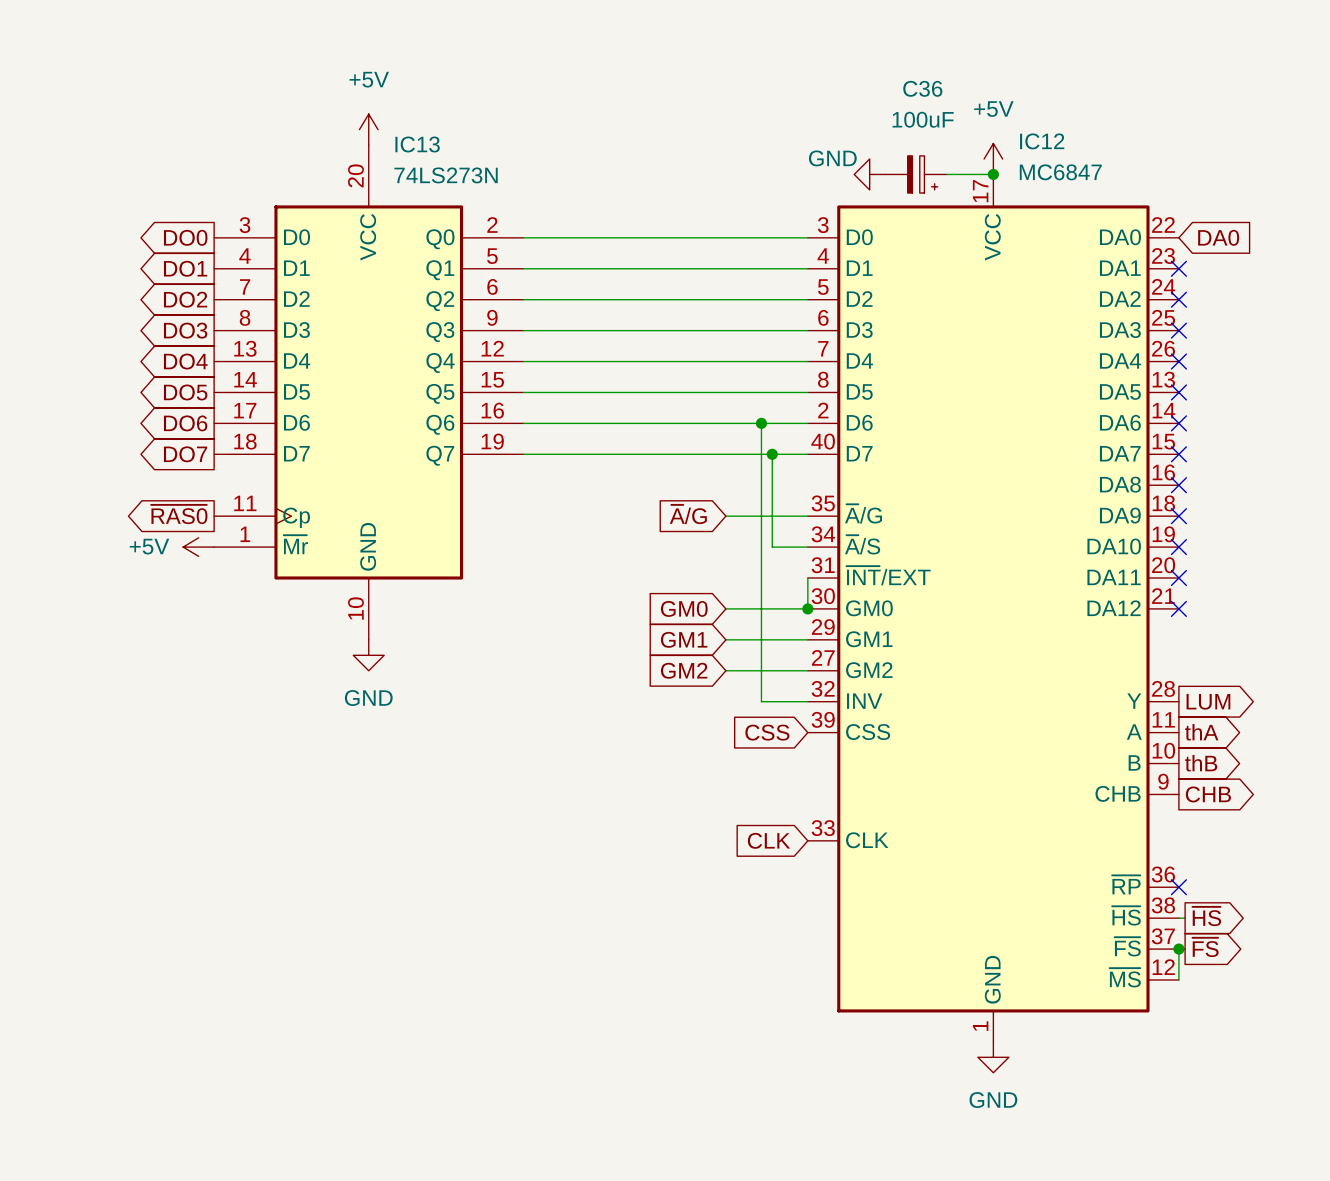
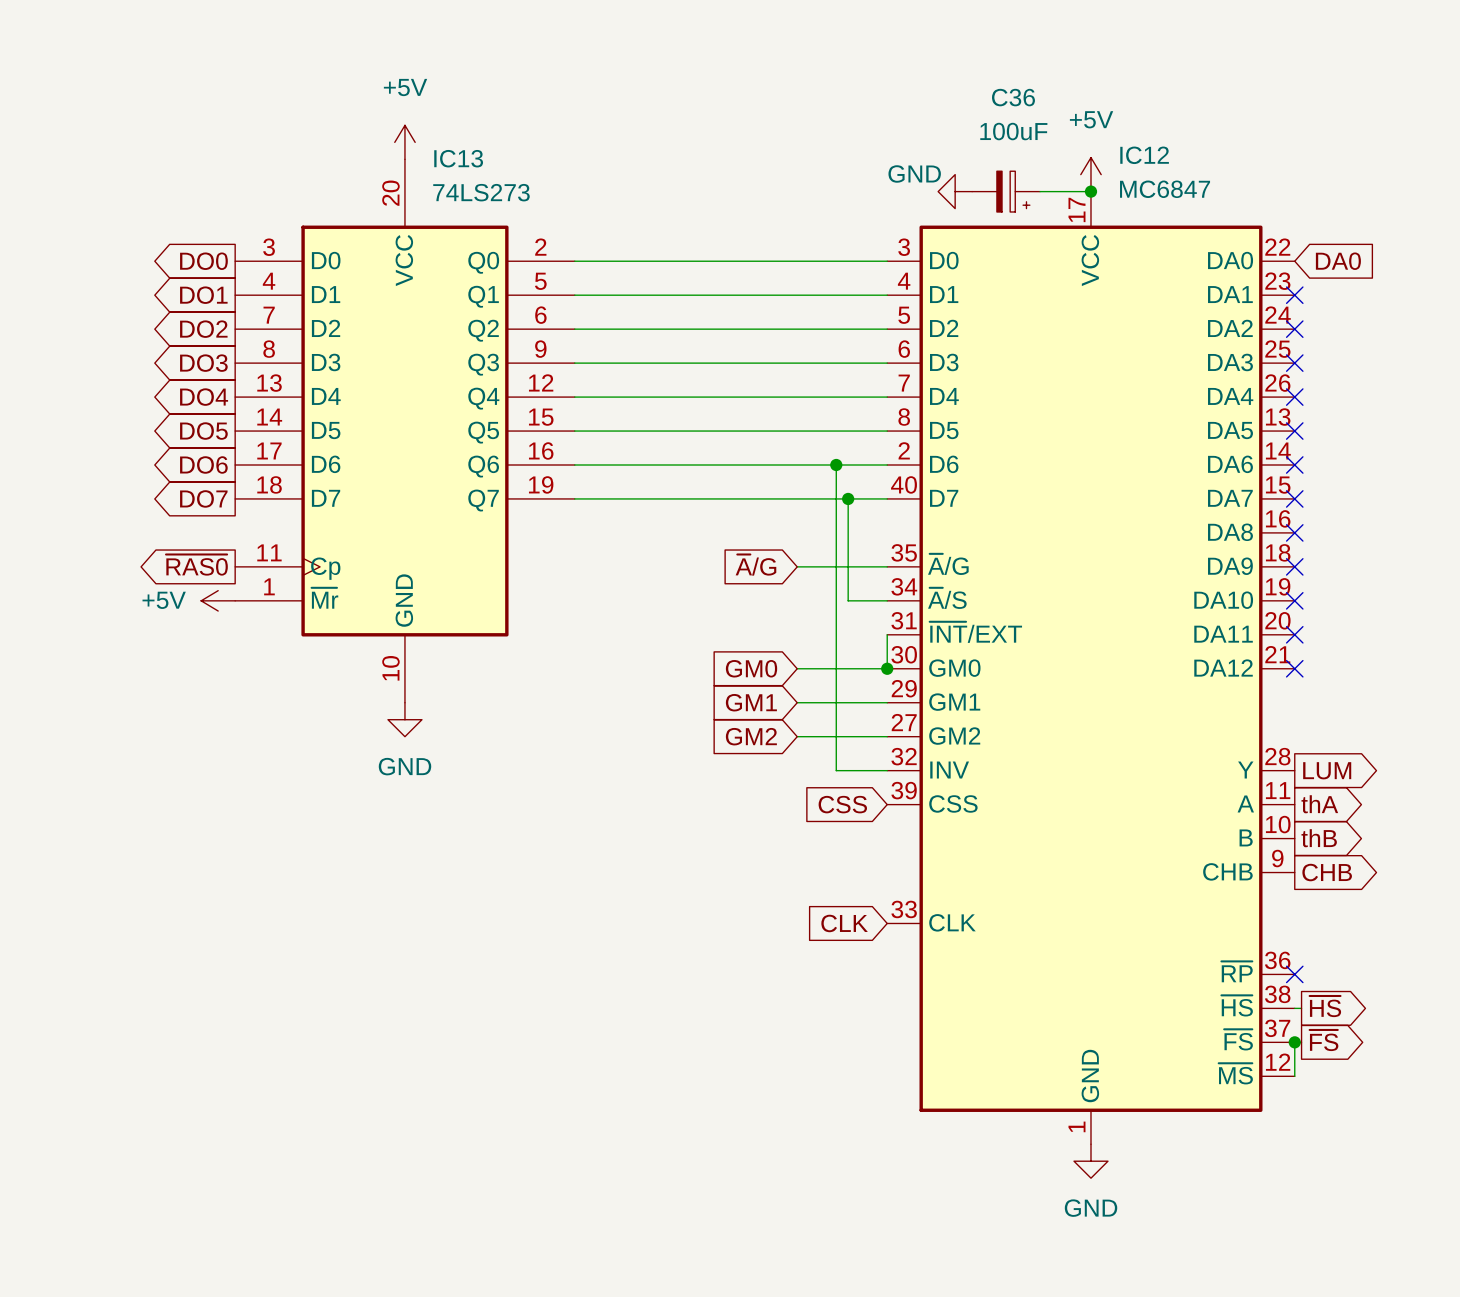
IC13 value: 74LS273N (446, 175) -> 74LS273 (481, 192)

